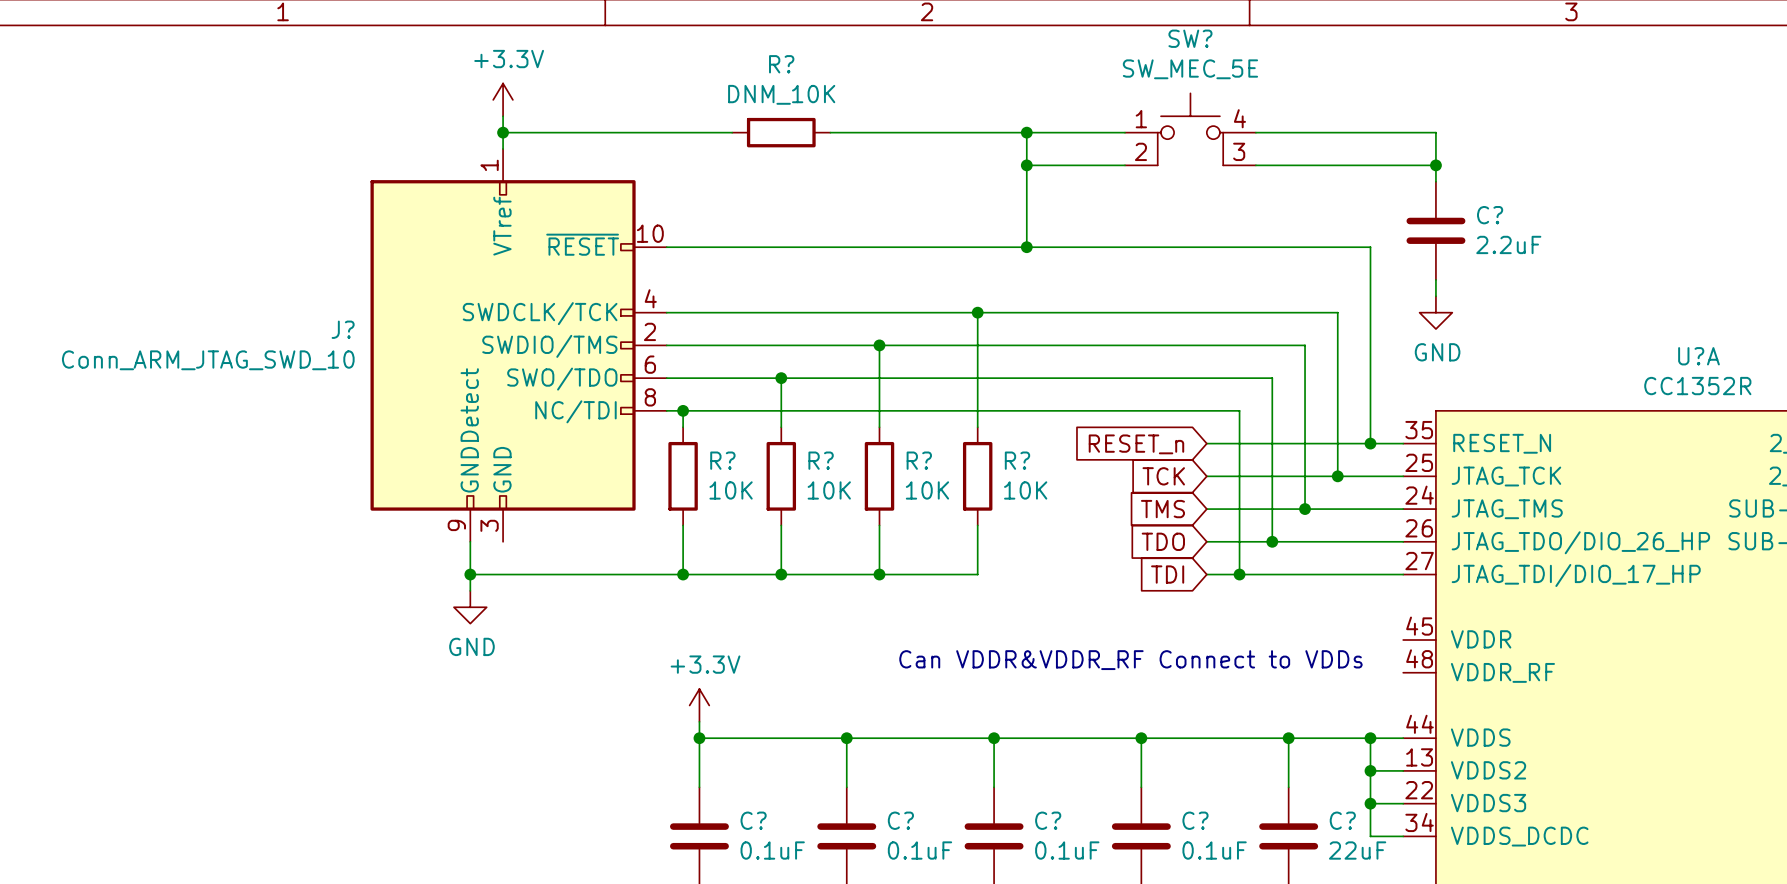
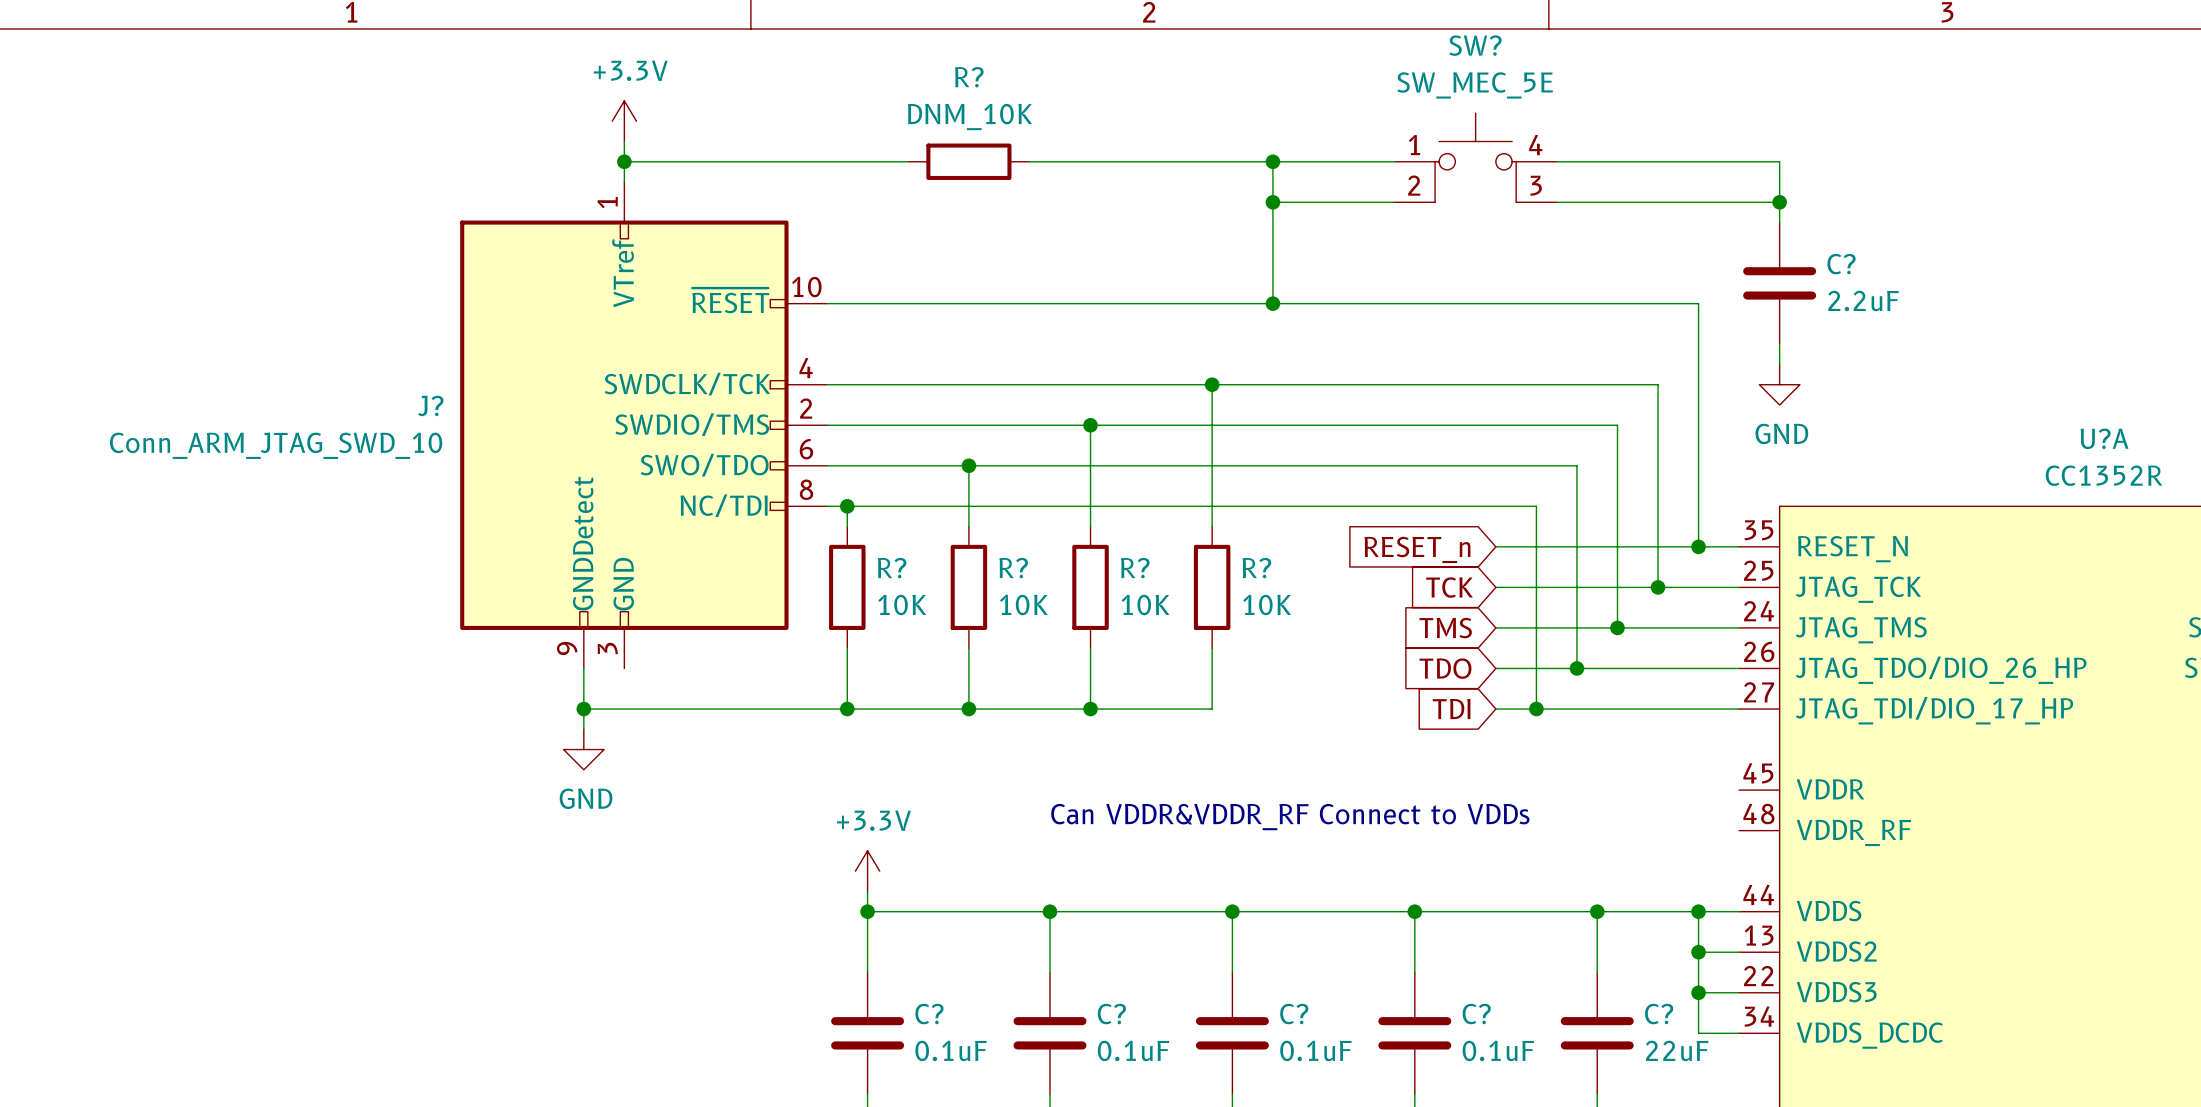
text position: Can VDDR&VDDR_RF Connect to VDDs (1130, 660) -> Can VDDR&VDDR_RF Connect to VDDs (1290, 817)

